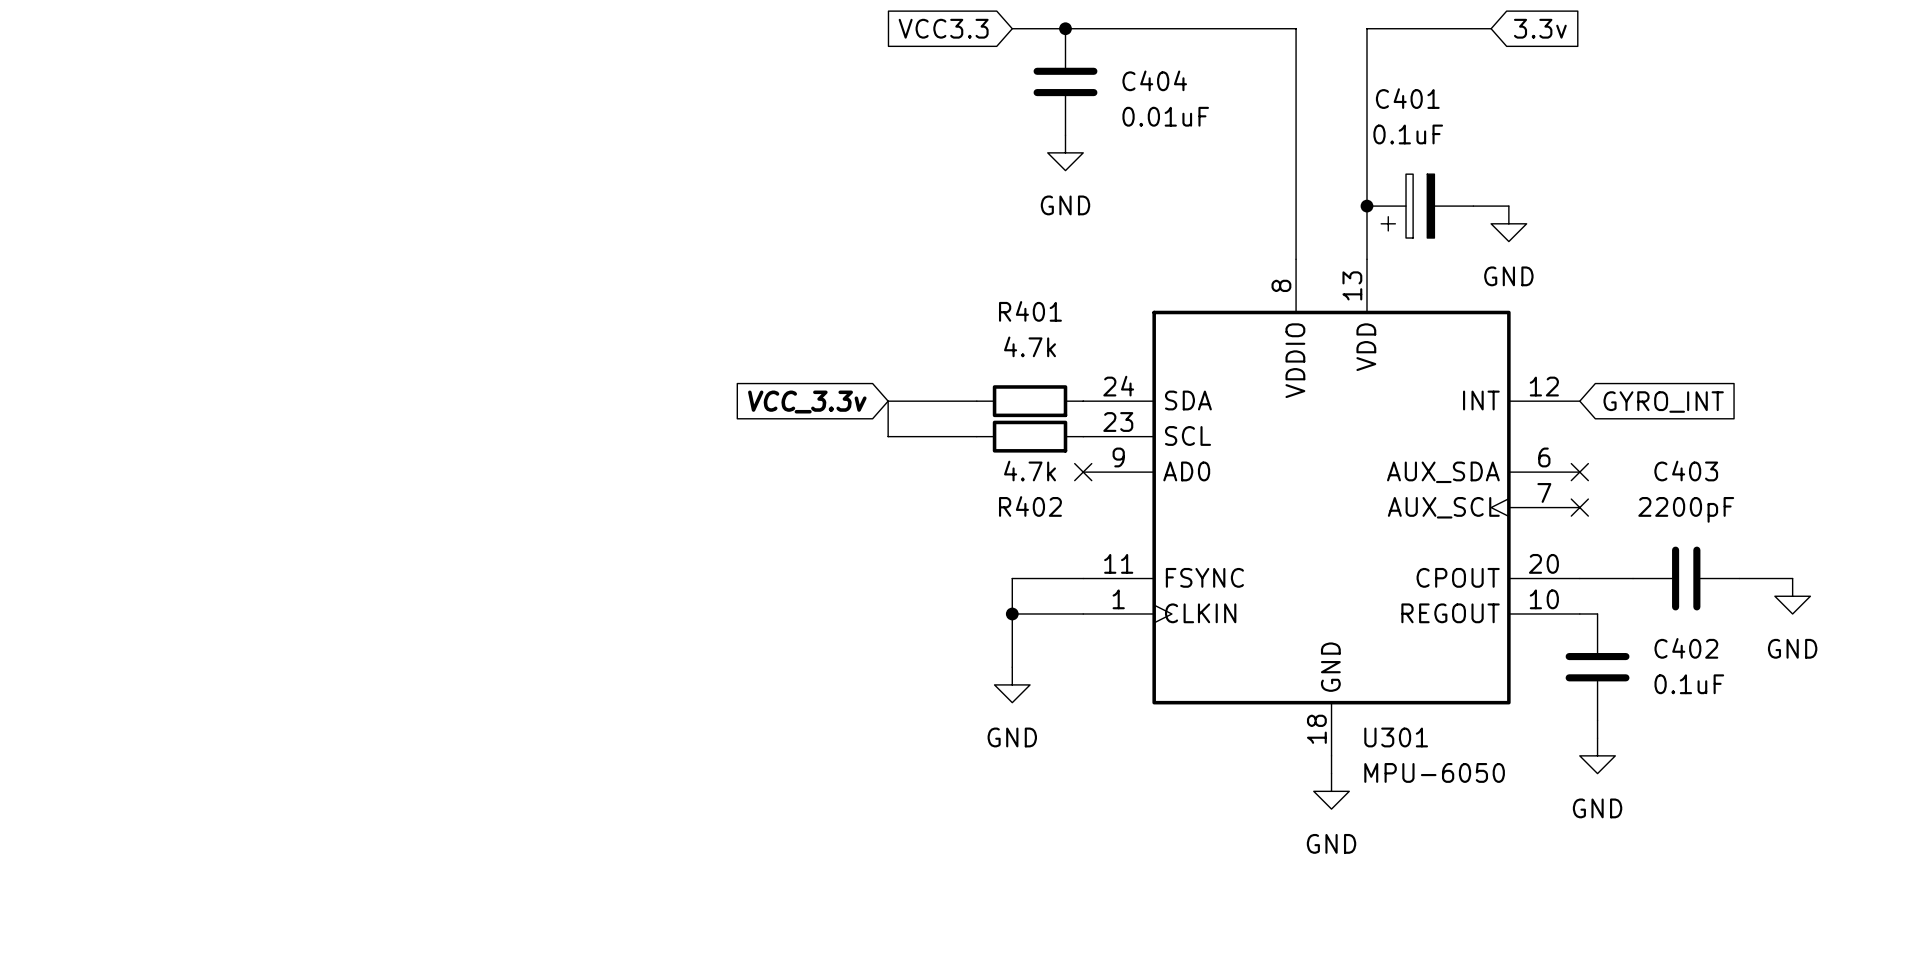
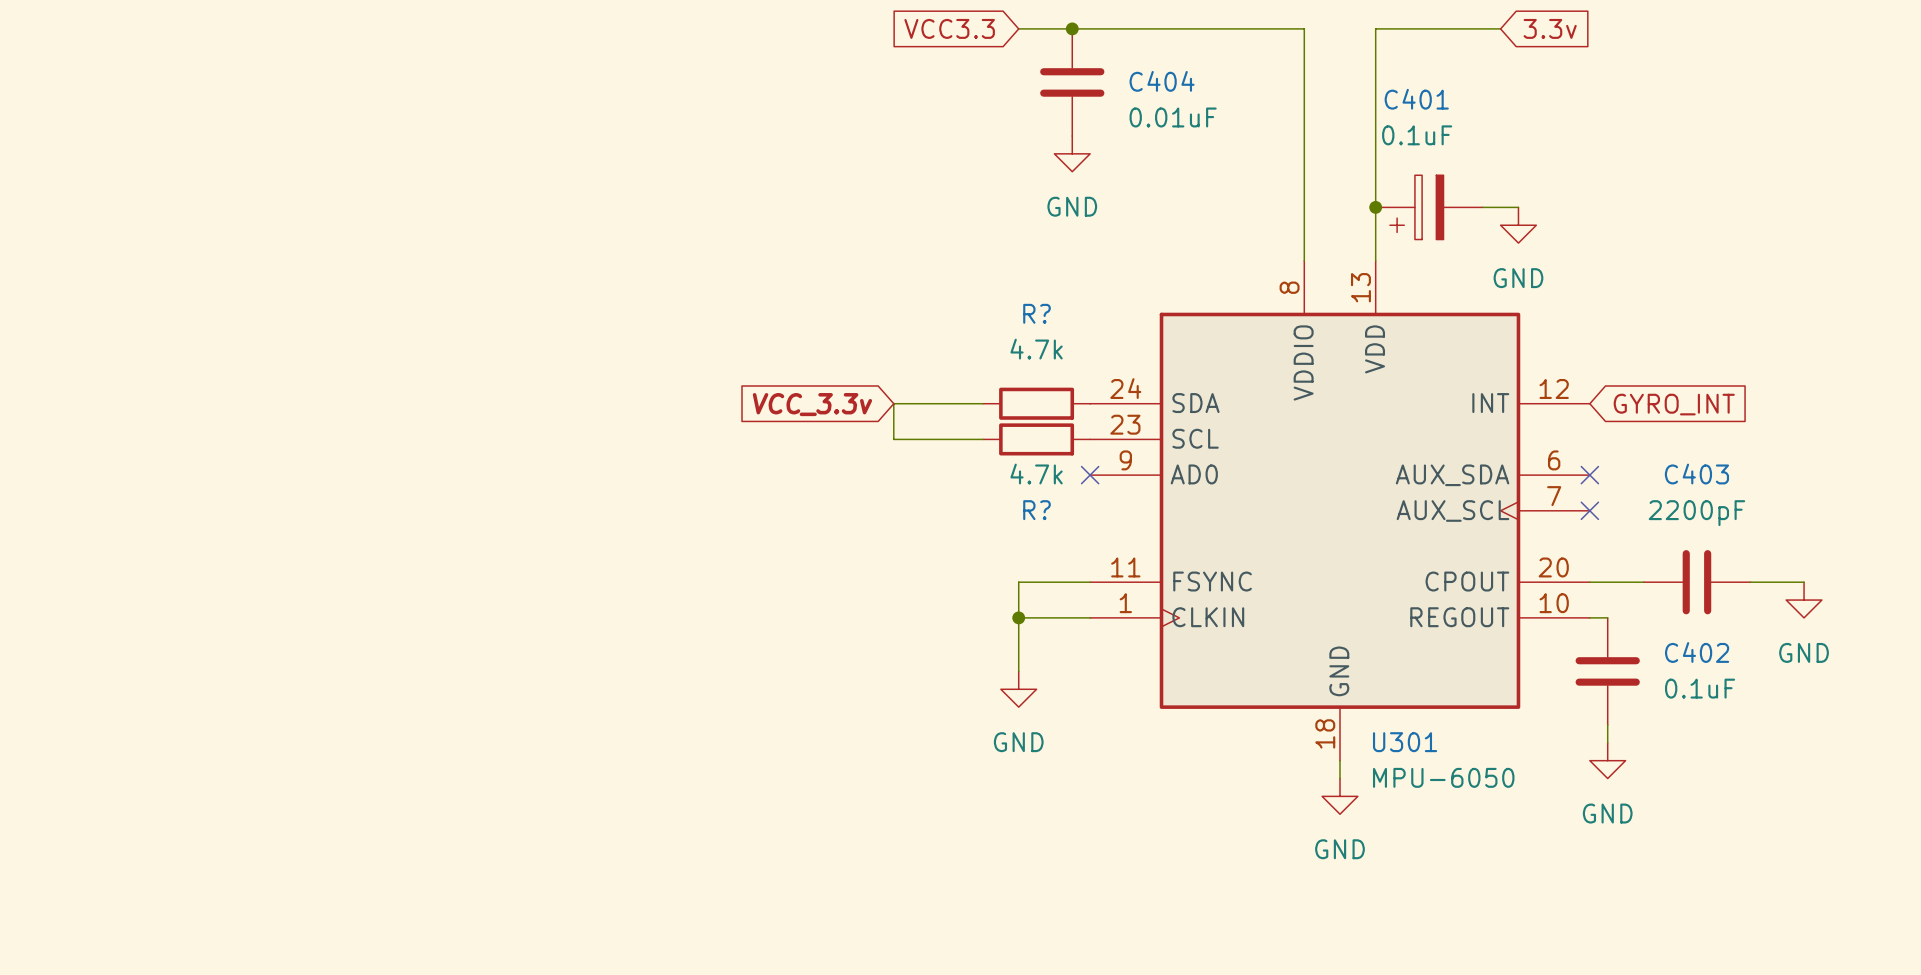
R401 name: R401 (1030, 311) -> R? (1037, 313)
R402 name: R402 (1030, 506) -> R? (1037, 510)

